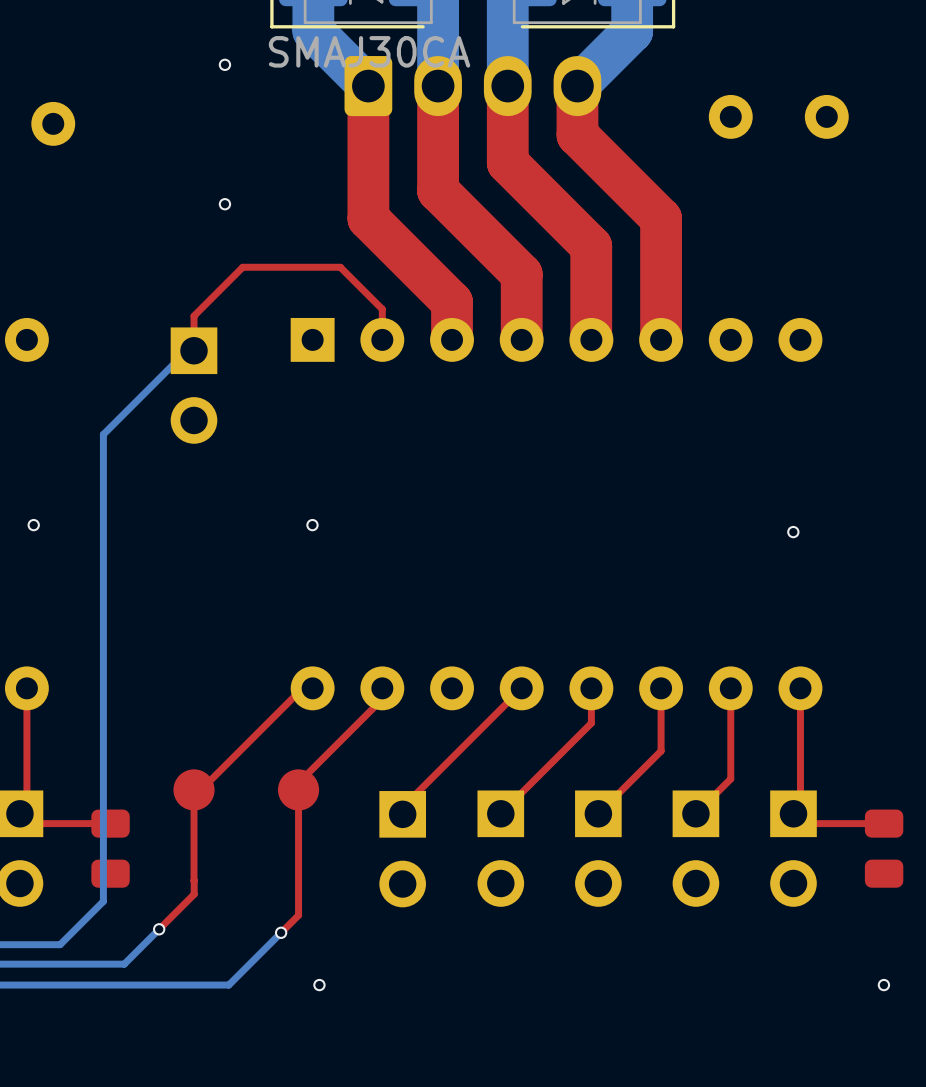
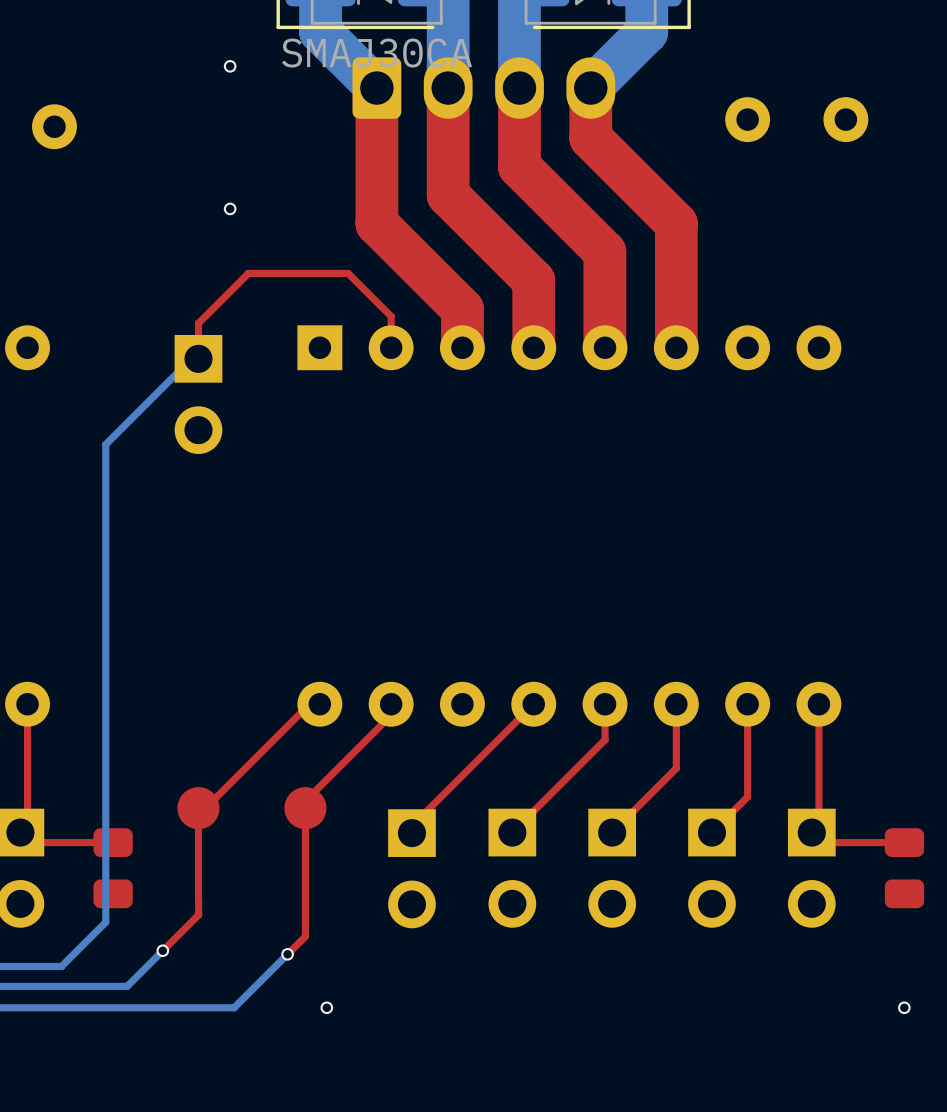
via: (33, 525) -> none
via: (312, 525) -> none
via: (793, 532) -> none

